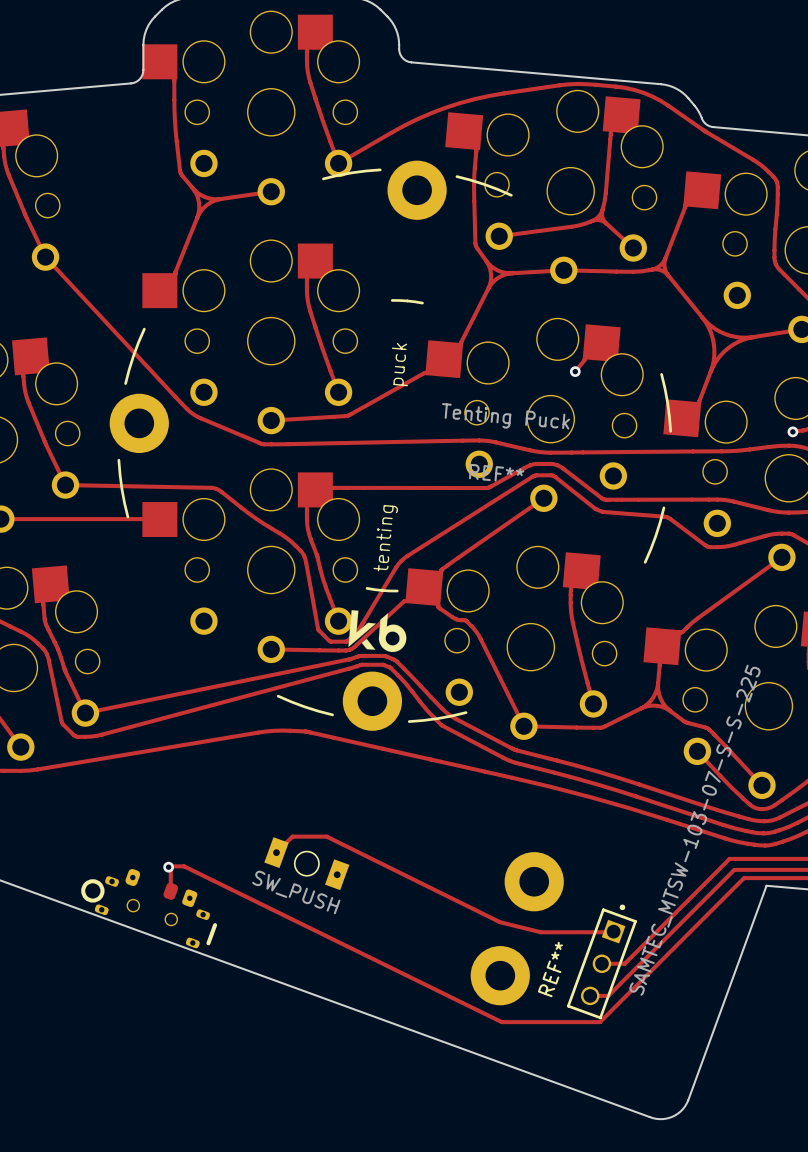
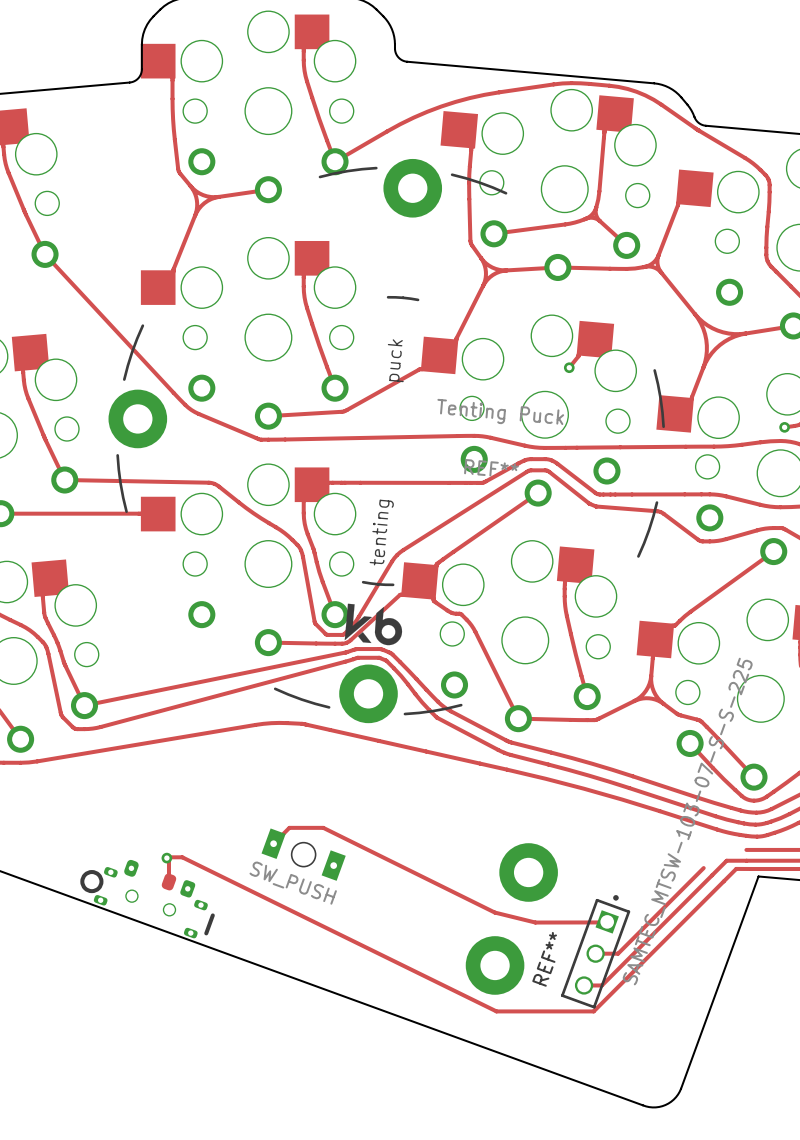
track: (754, 858) (729, 858) (624, 963) -> (703, 868) (618, 953)

